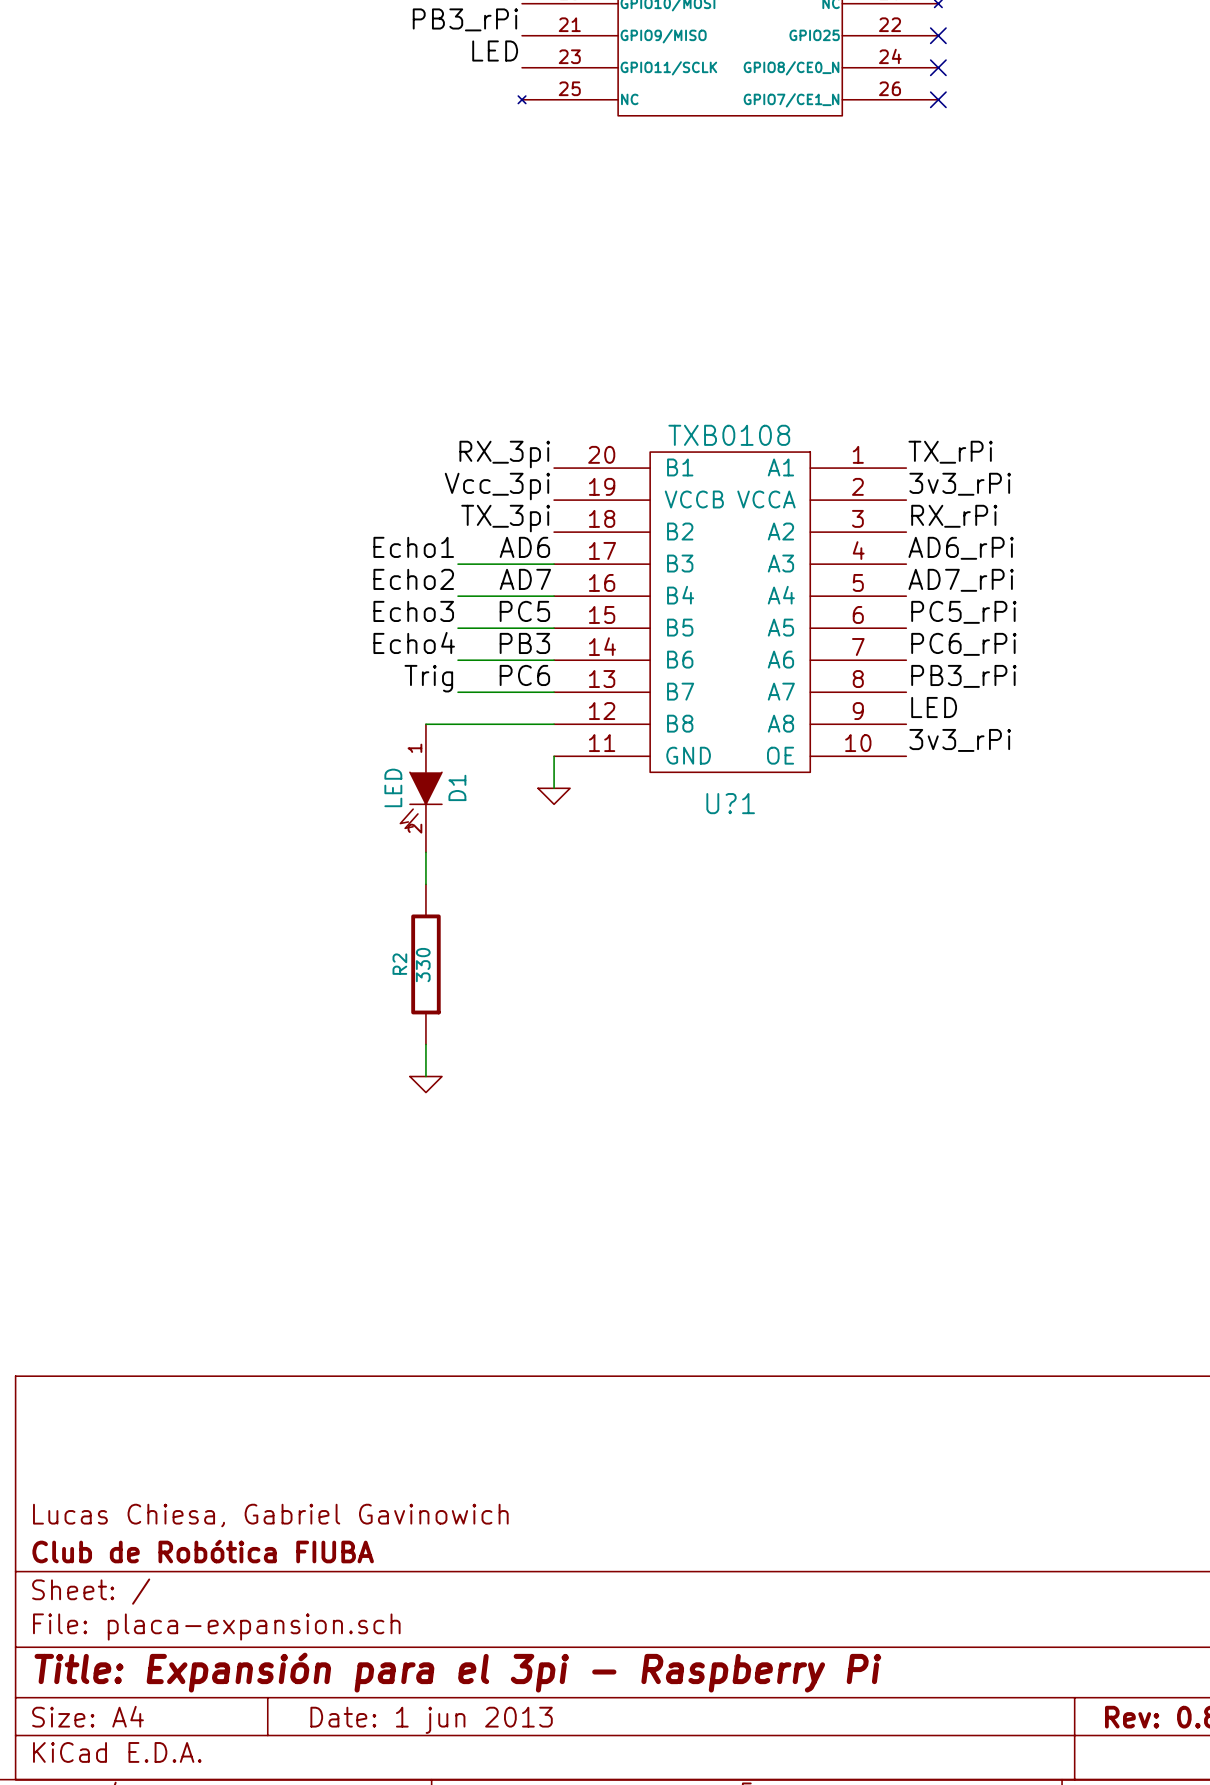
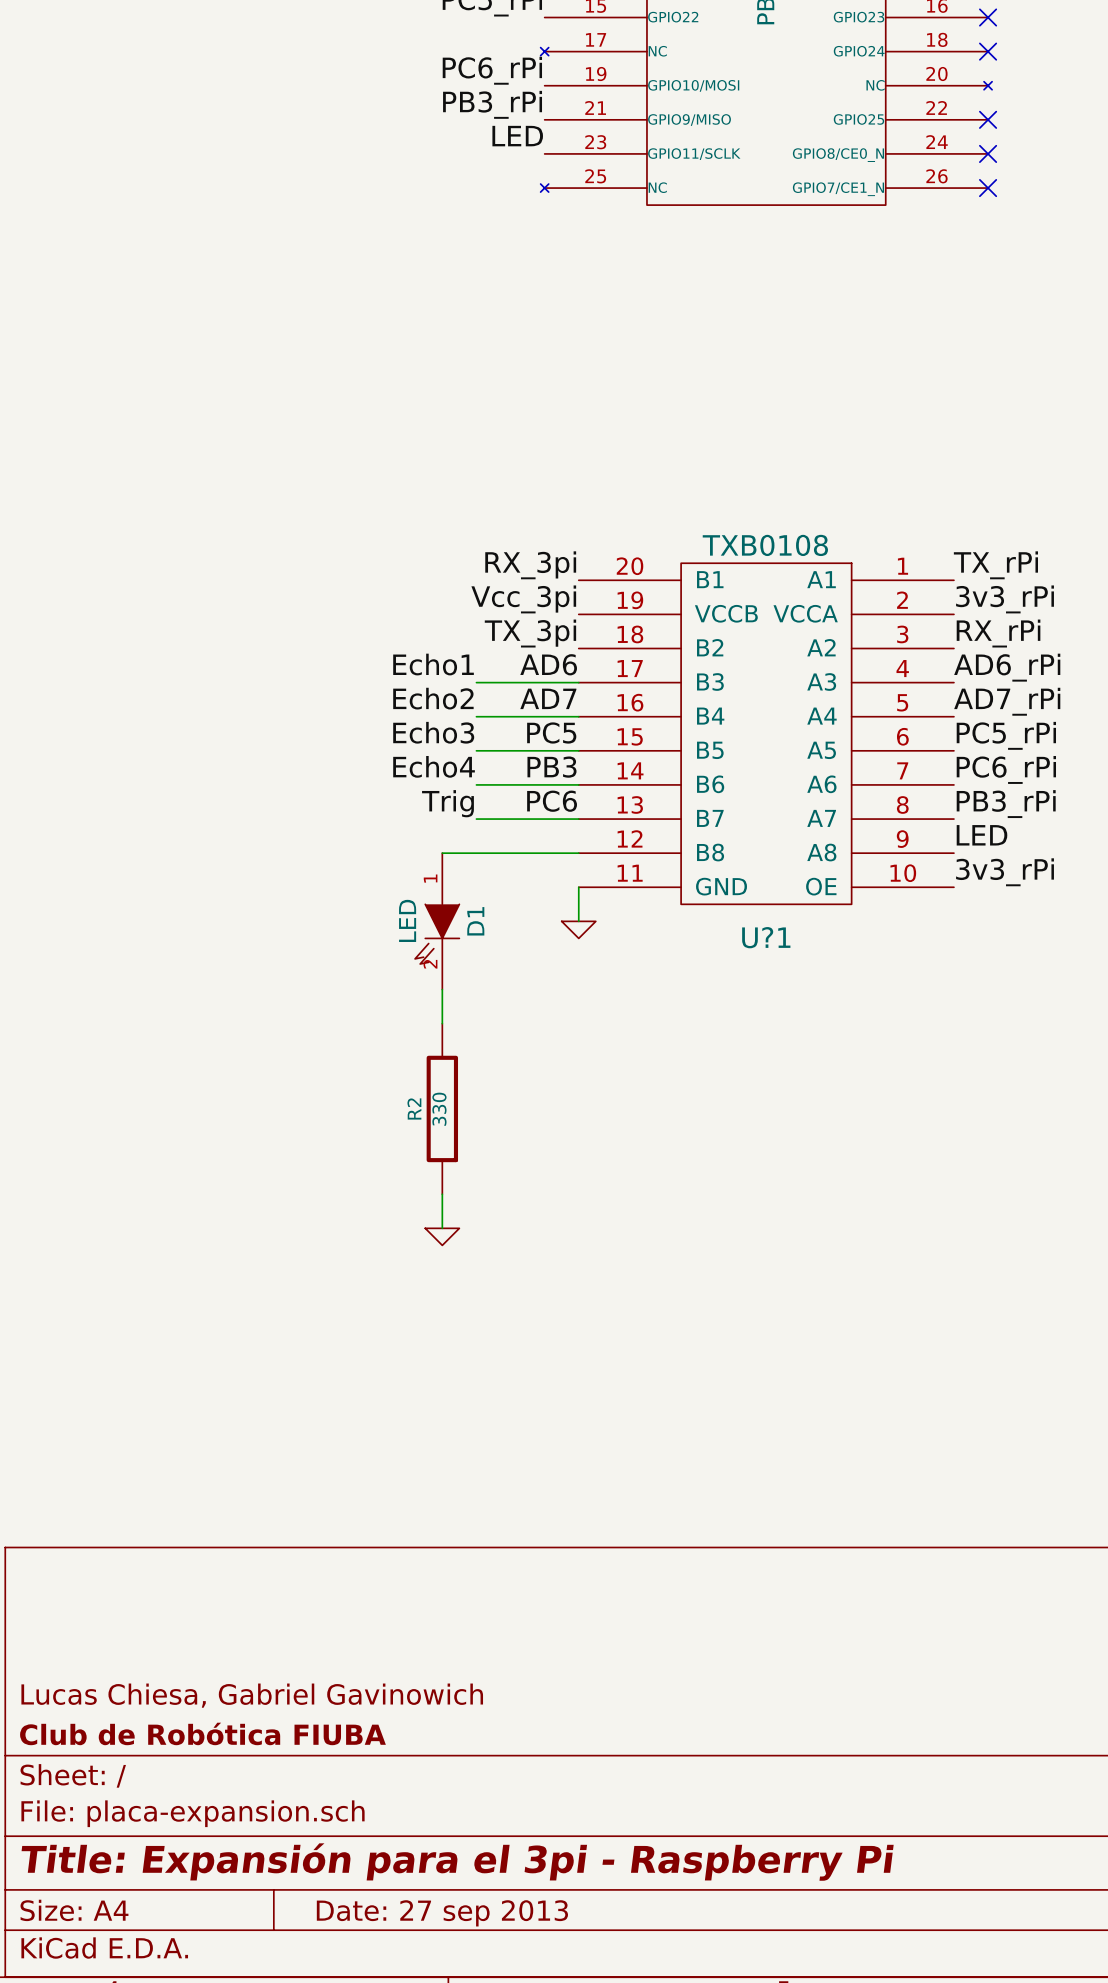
title block: Date: 1 jun 2013 (431, 1720) -> Date: 27 sep 2013 (442, 1913)

